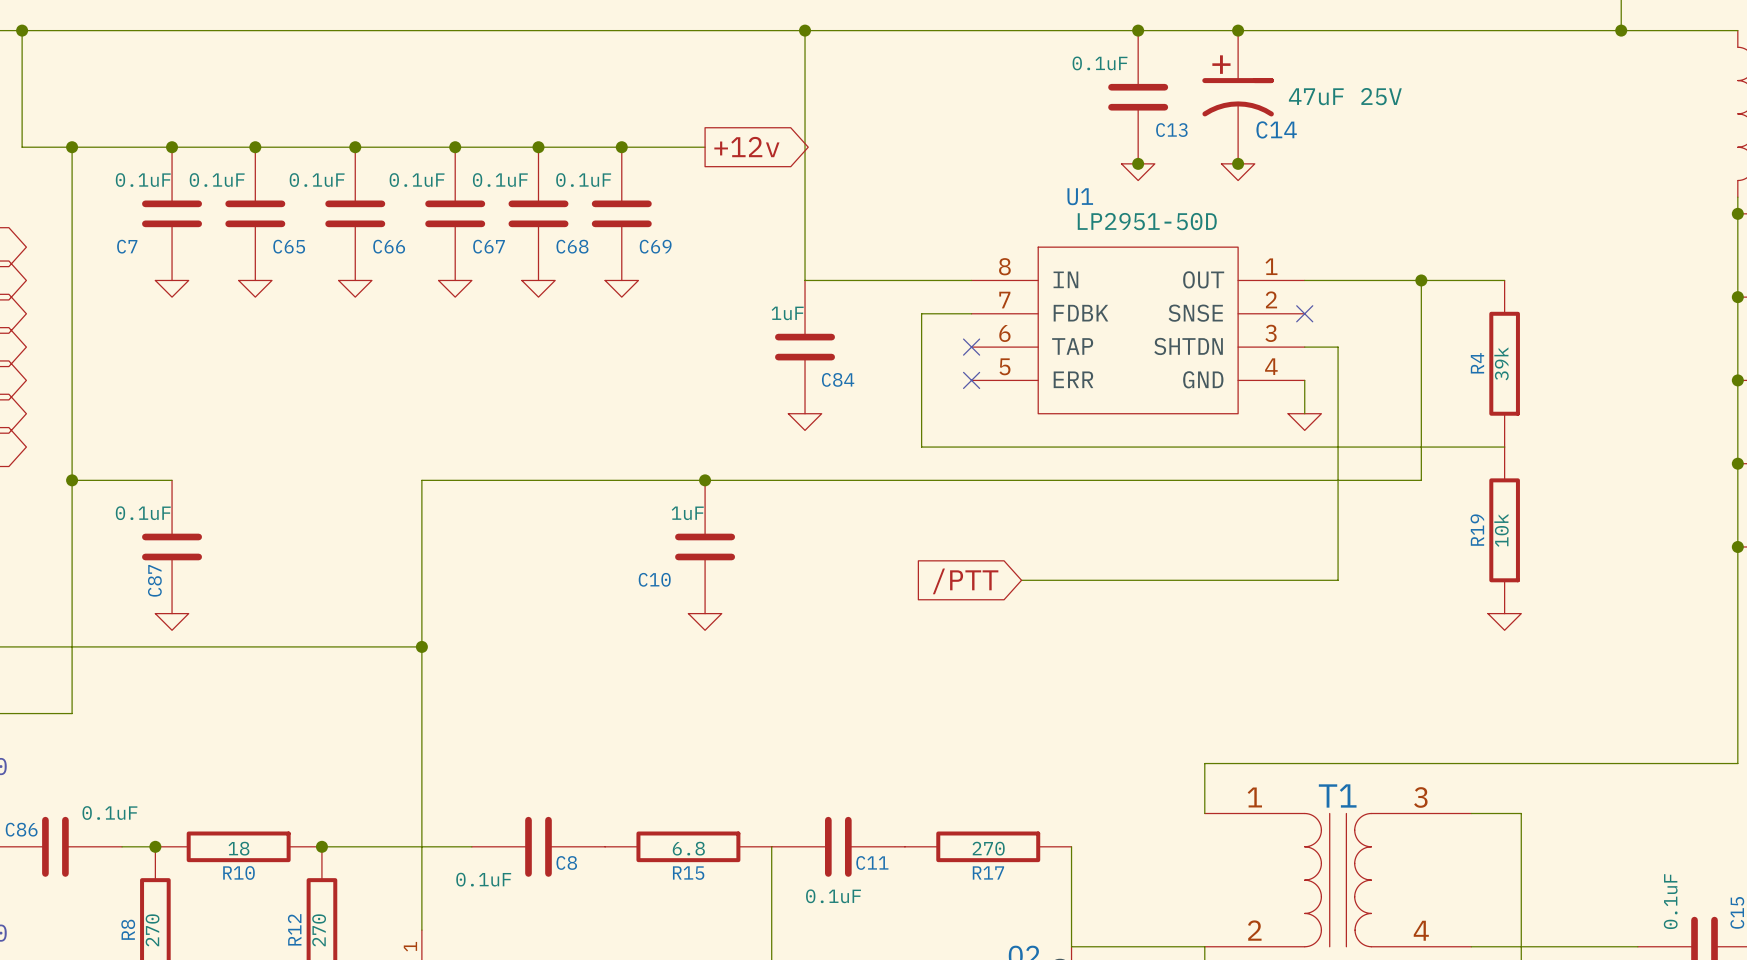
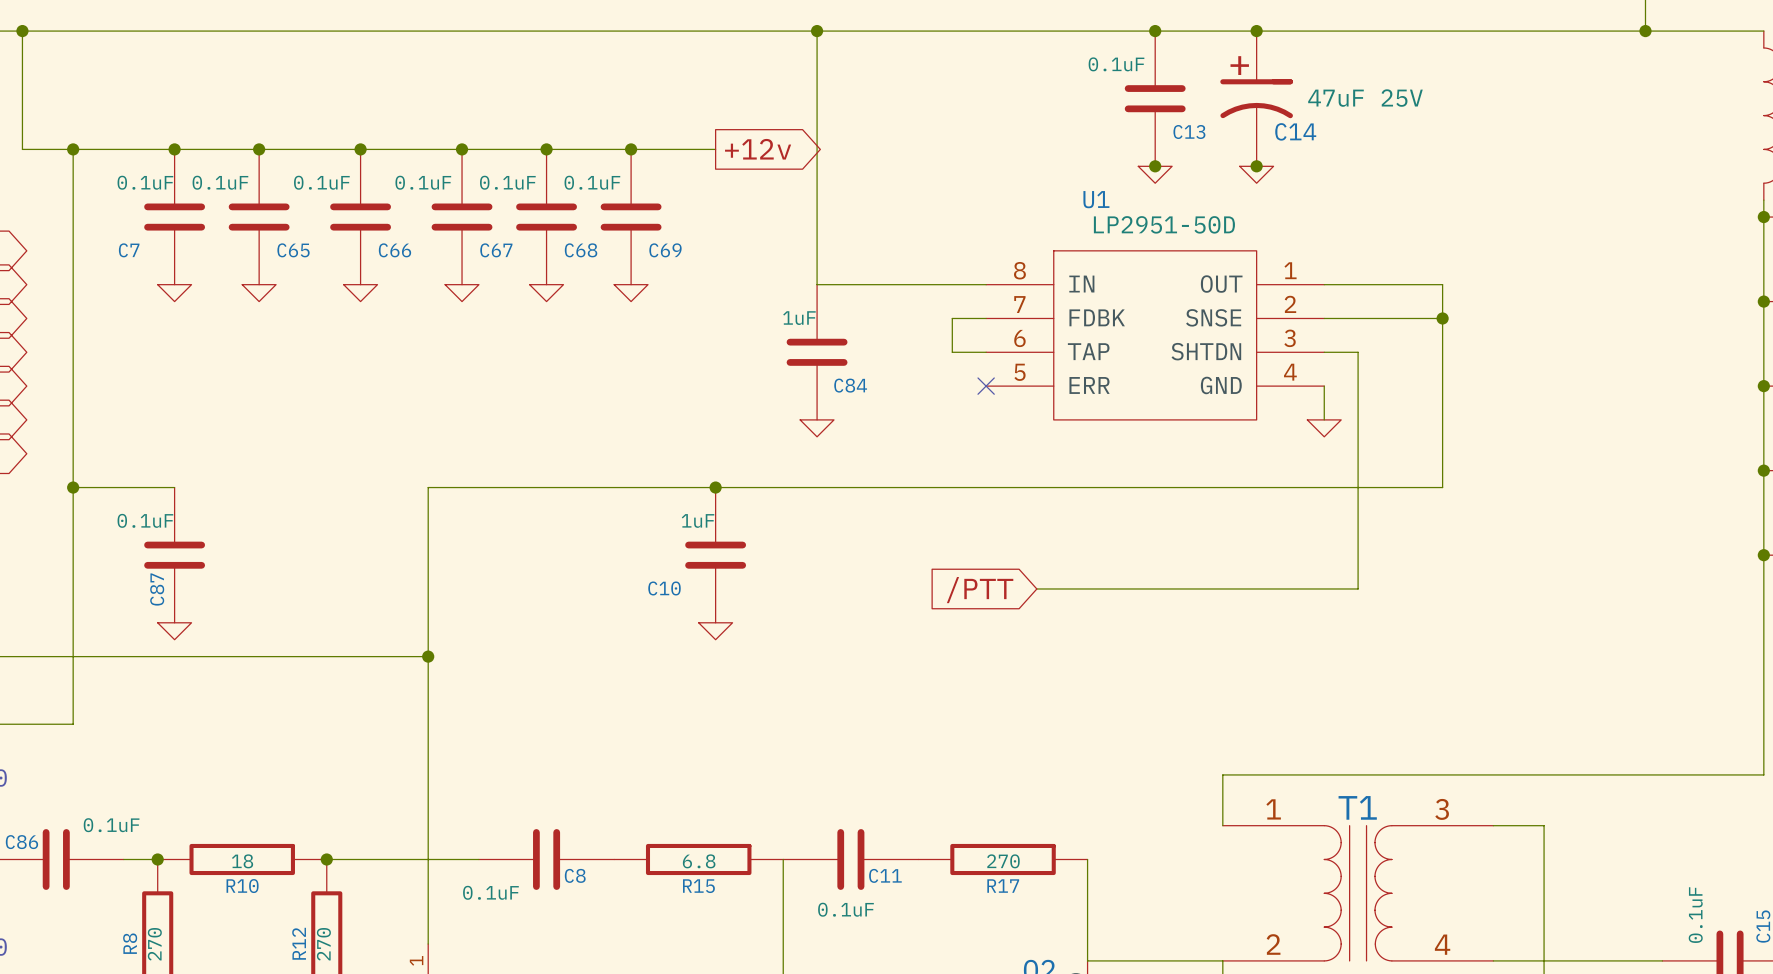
wire: (1421, 280) (1504, 280) -> none
junction position: (1421, 280) -> (1442, 318)
wire: (938, 313) (921, 313) (921, 447) (1504, 447) -> (952, 318) (952, 352) (986, 352)
wire: none -> (1324, 318) (1442, 318)
no-connect mark: (1304, 313) -> none
no-connect mark: (971, 347) -> none
R4: 39k (1504, 363) -> none
R19: 10k (1504, 530) -> none
power symbol: (1504, 621) -> none

